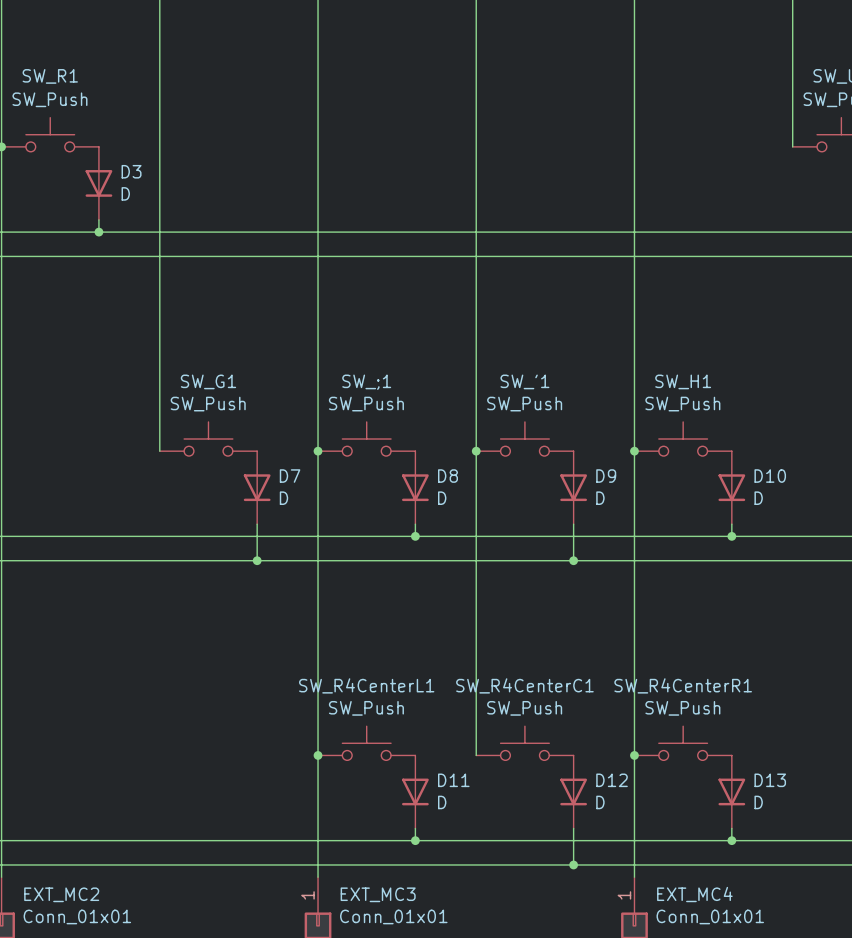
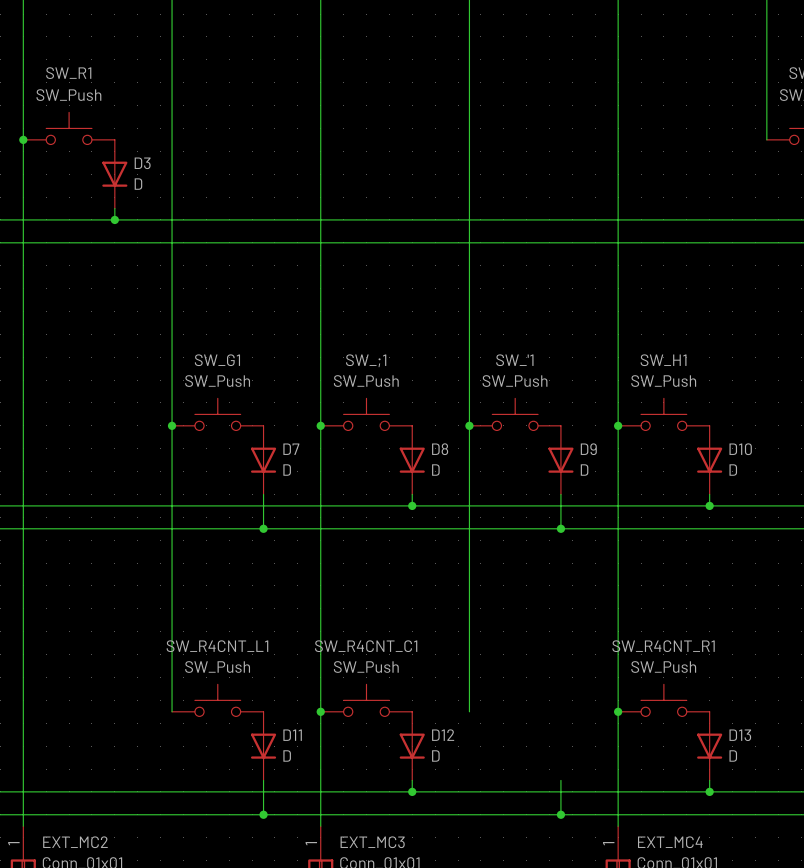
wire: none -> (172, 425) (172, 711)
junction: none -> (172, 425)
SW_R4CenterL1 name: SW_R4CenterL1 (366, 685) -> SW_R4CNT_C1 (366, 646)
SW_R4CenterR1 name: SW_R4CenterR1 (683, 685) -> SW_R4CNT_R1 (663, 646)
SW_R4CNT_L1: none -> SW_Push (217, 700)
SW_R4CenterC1: SW_Push (524, 743) -> none
D11 name: D11 (453, 780) -> D12 (443, 735)
D11: none -> D (263, 746)
D12: D (573, 791) -> none
wire: none -> (263, 780) (263, 814)
junction: none -> (263, 814)

